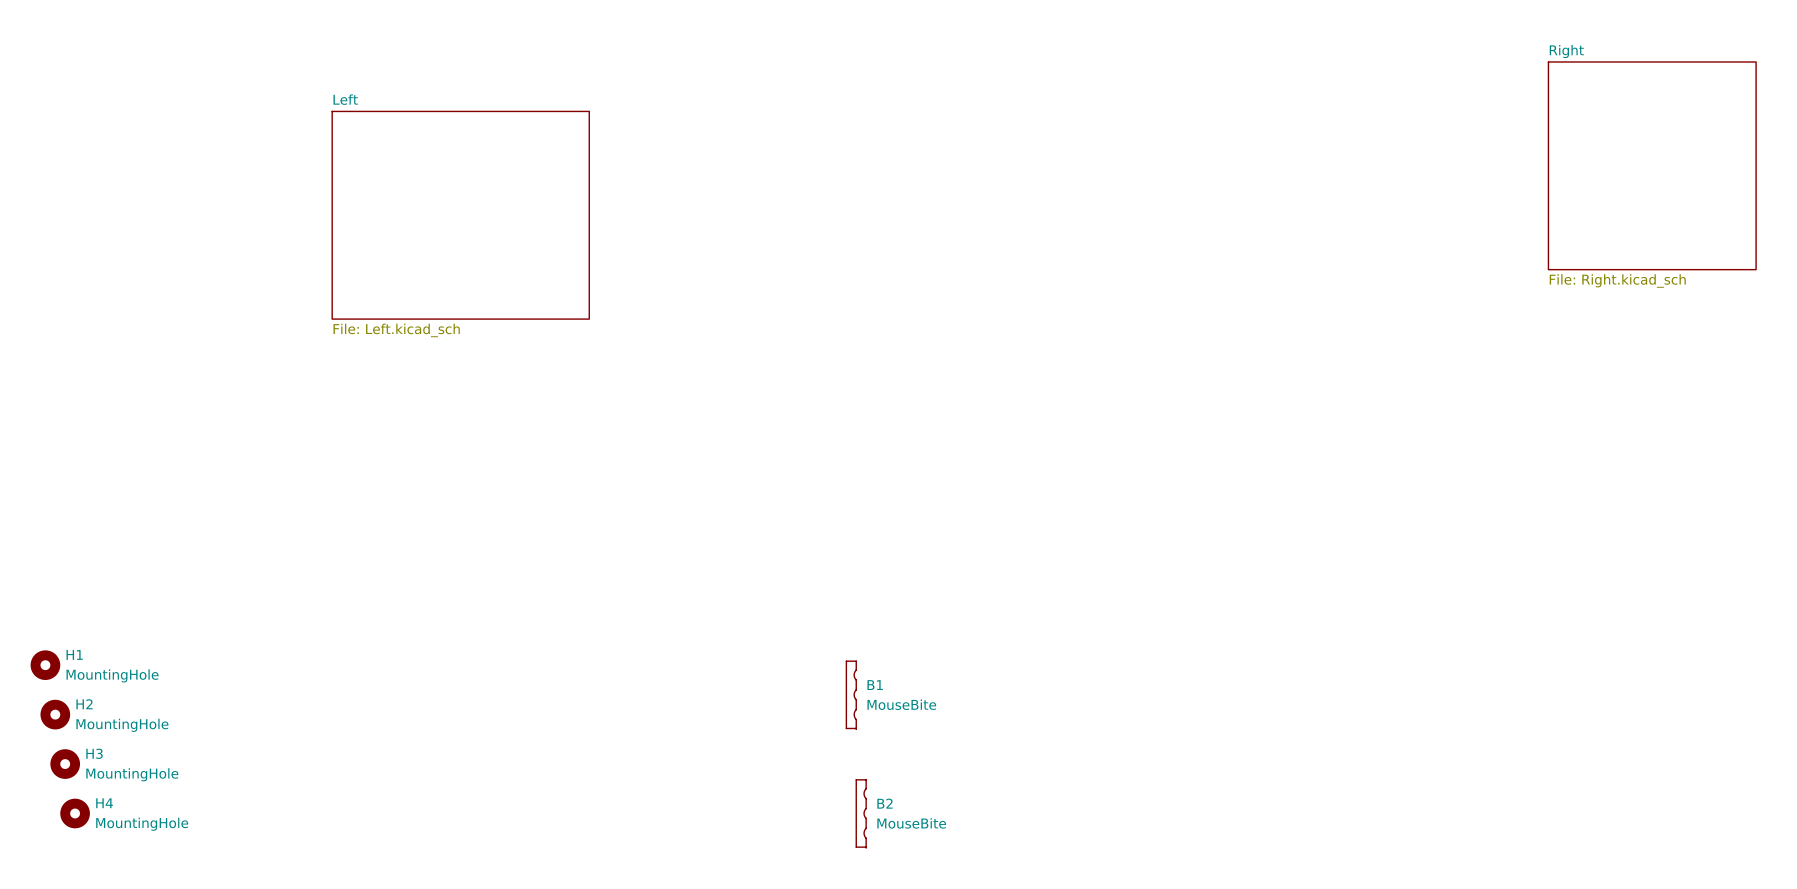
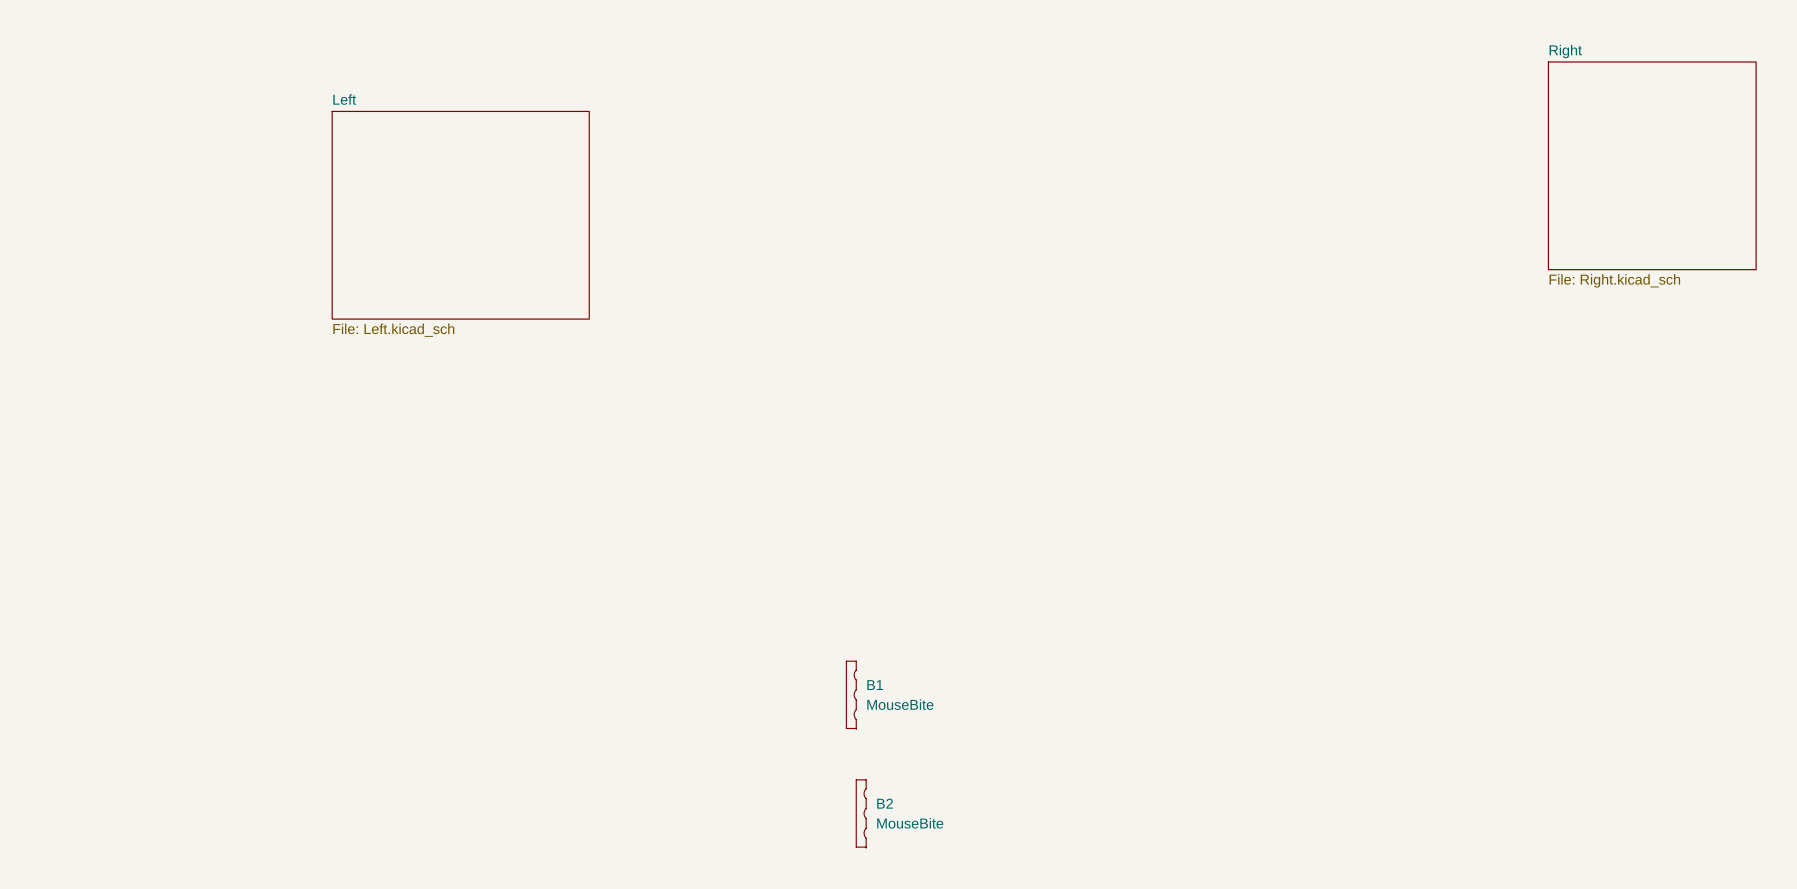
H1: MountingHole (45, 665) -> none
H2: MountingHole (55, 714) -> none
H3: MountingHole (65, 764) -> none
H4: MountingHole (75, 813) -> none

